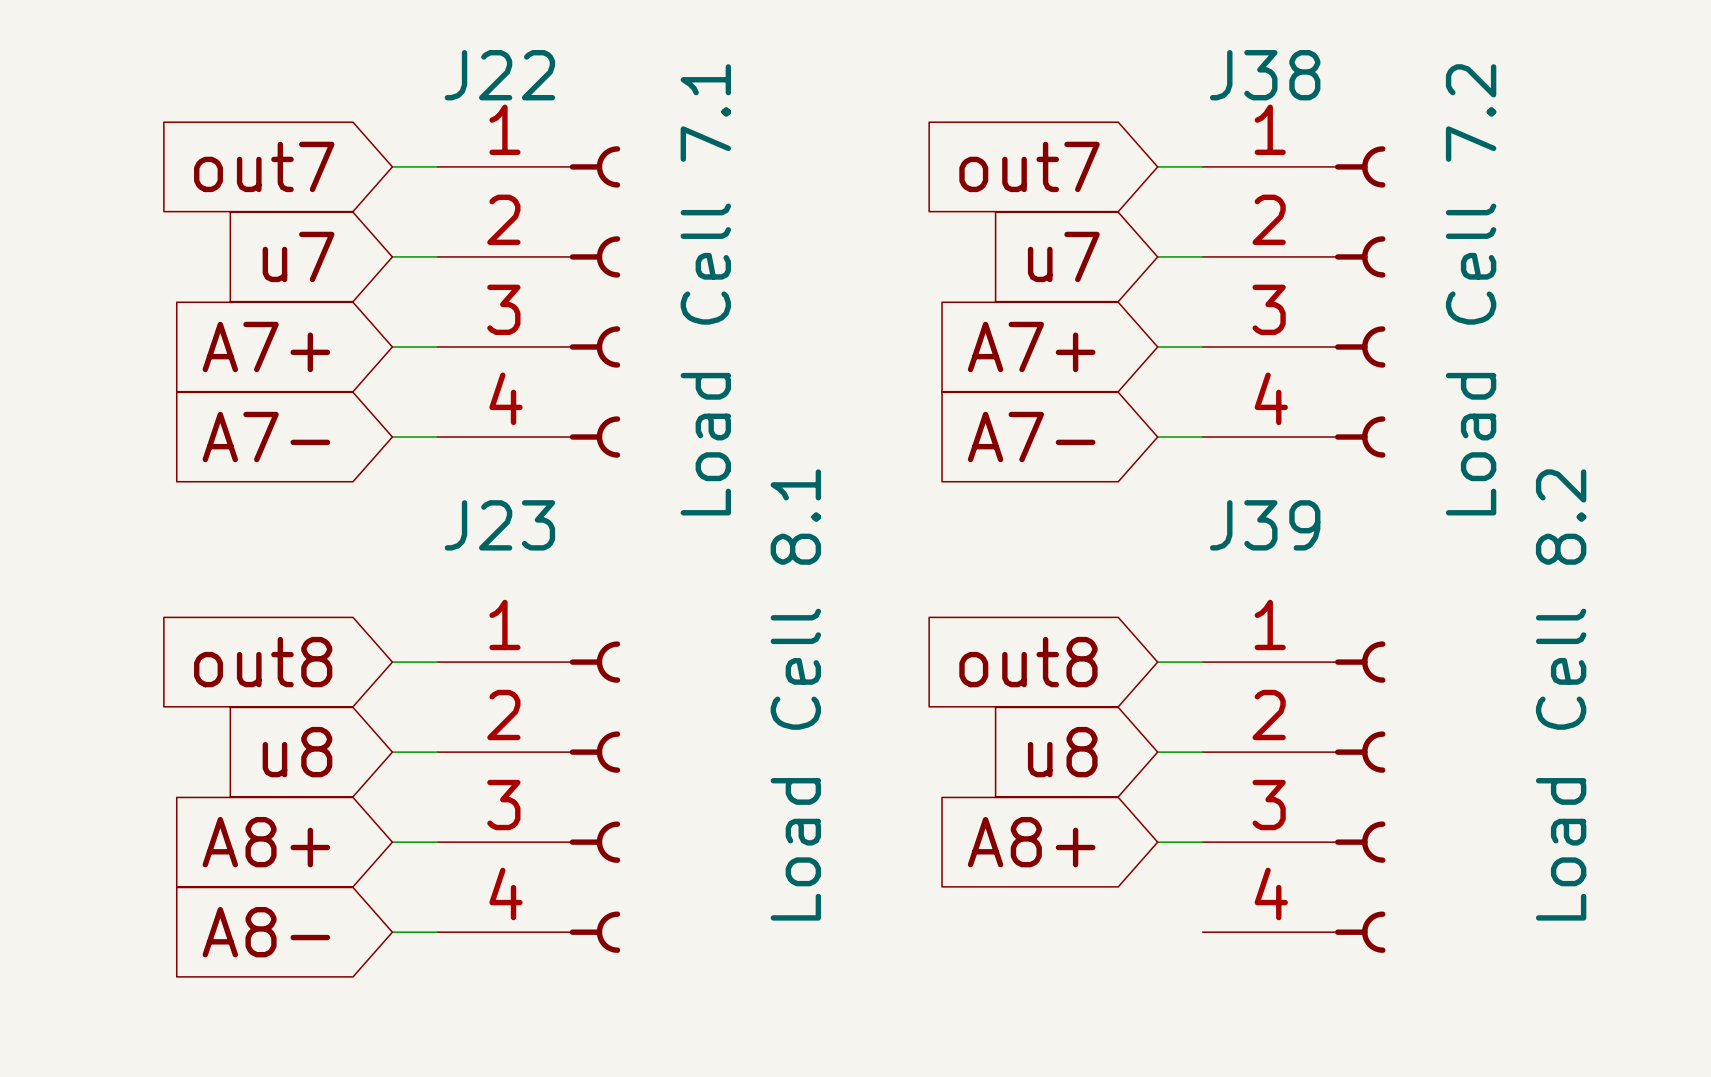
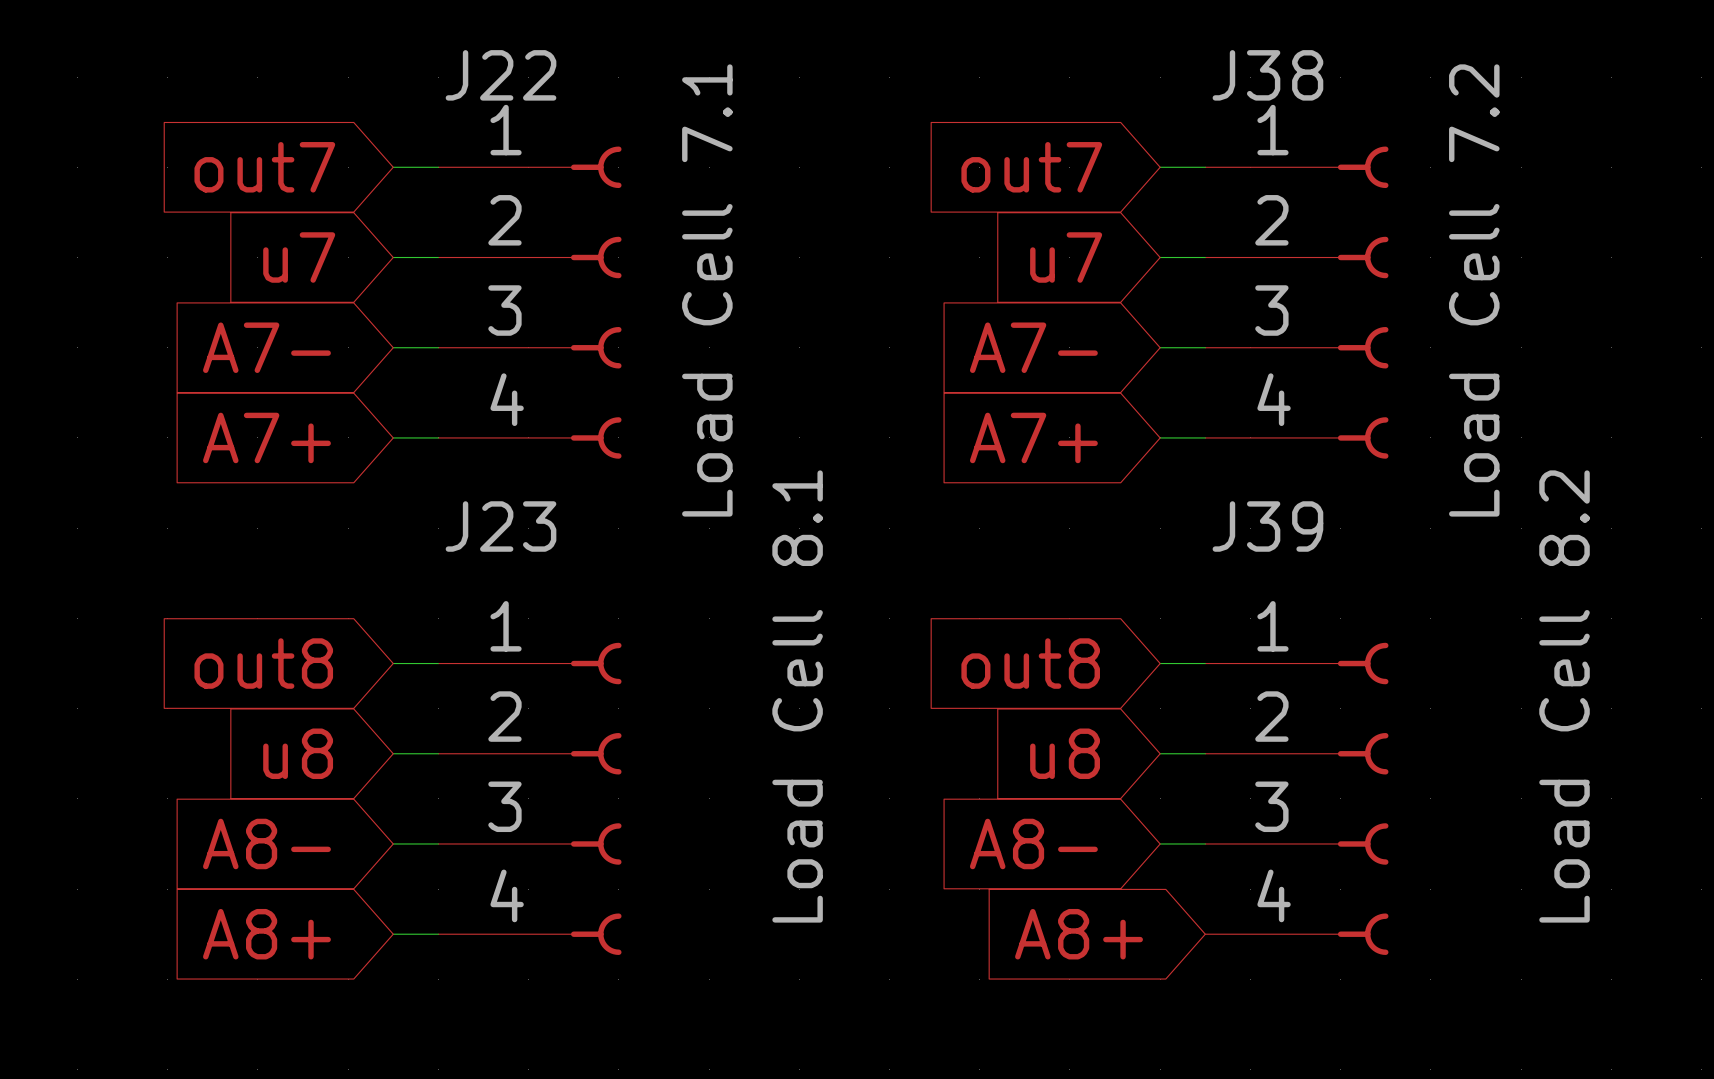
global label: A7+ (266, 346) -> A7- (266, 347)
global label: A7+ (1031, 346) -> A7- (1033, 347)
global label: A7- (266, 437) -> A7+ (266, 437)
global label: A7- (1031, 437) -> A7+ (1033, 437)
global label: A8+ (266, 842) -> A8- (266, 843)
global label: A8+ (1031, 842) -> A8- (1033, 843)
global label: A8- (266, 932) -> A8+ (266, 934)
global label: none -> A8+ (1079, 934)

